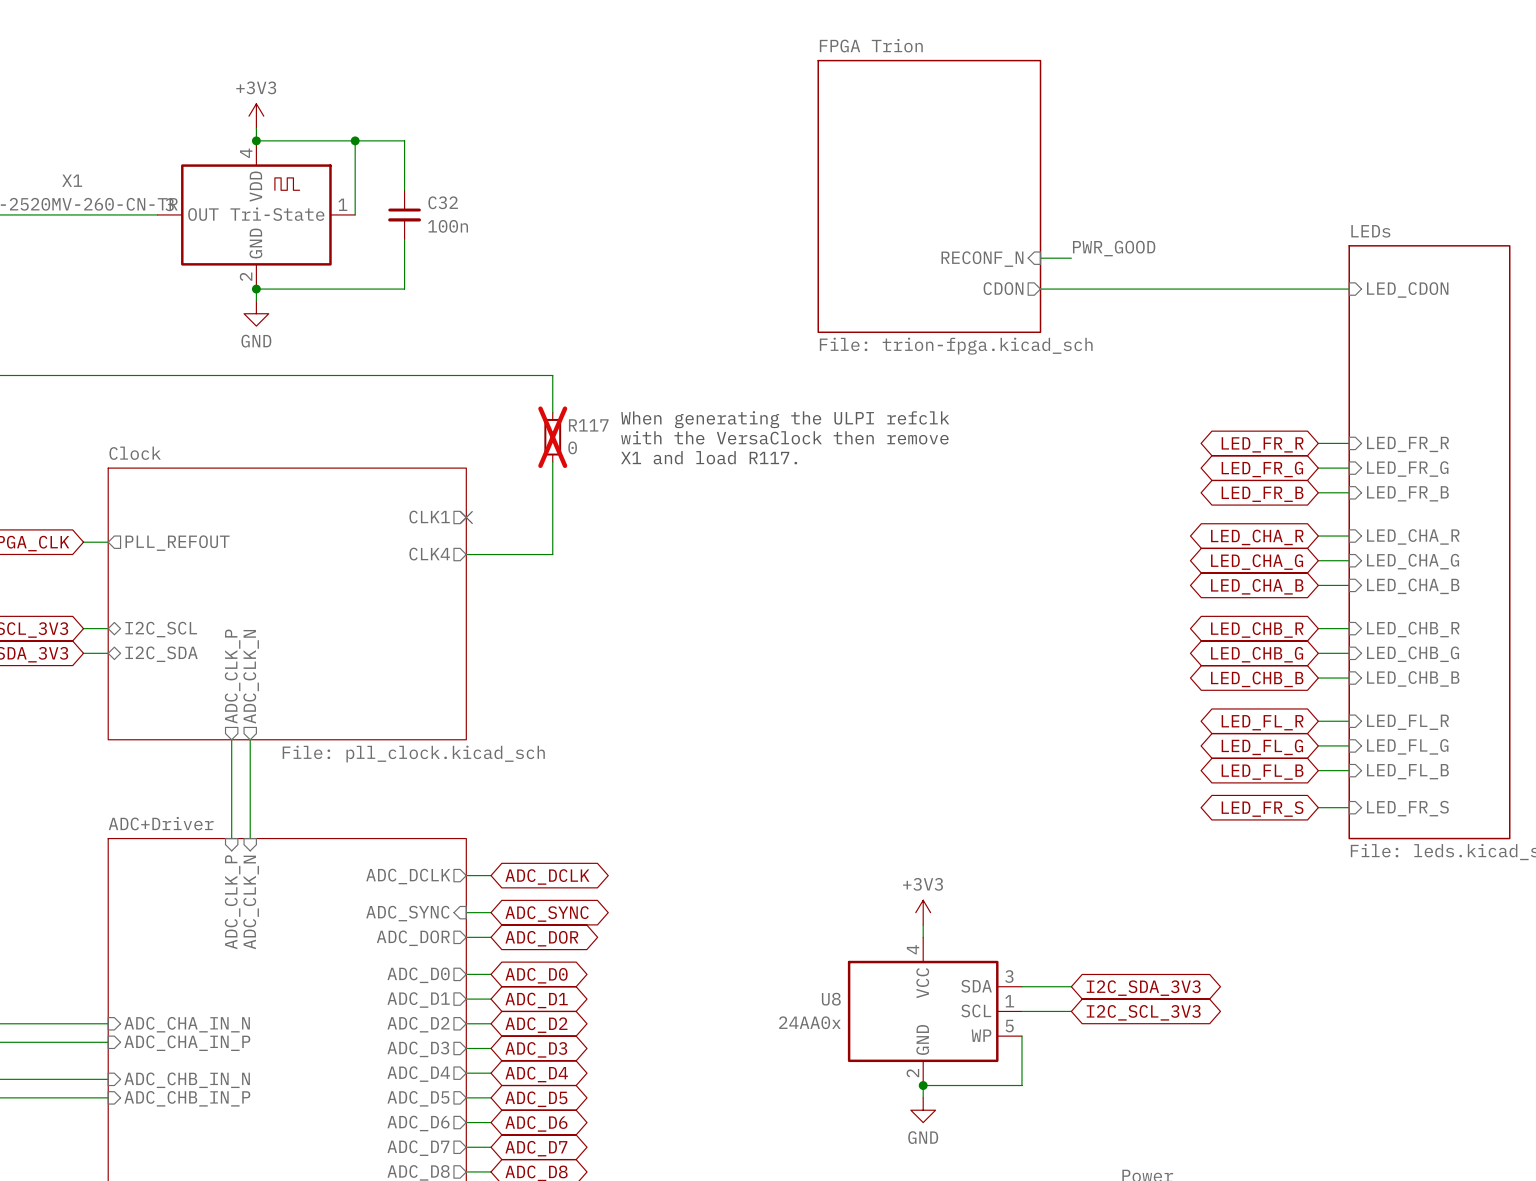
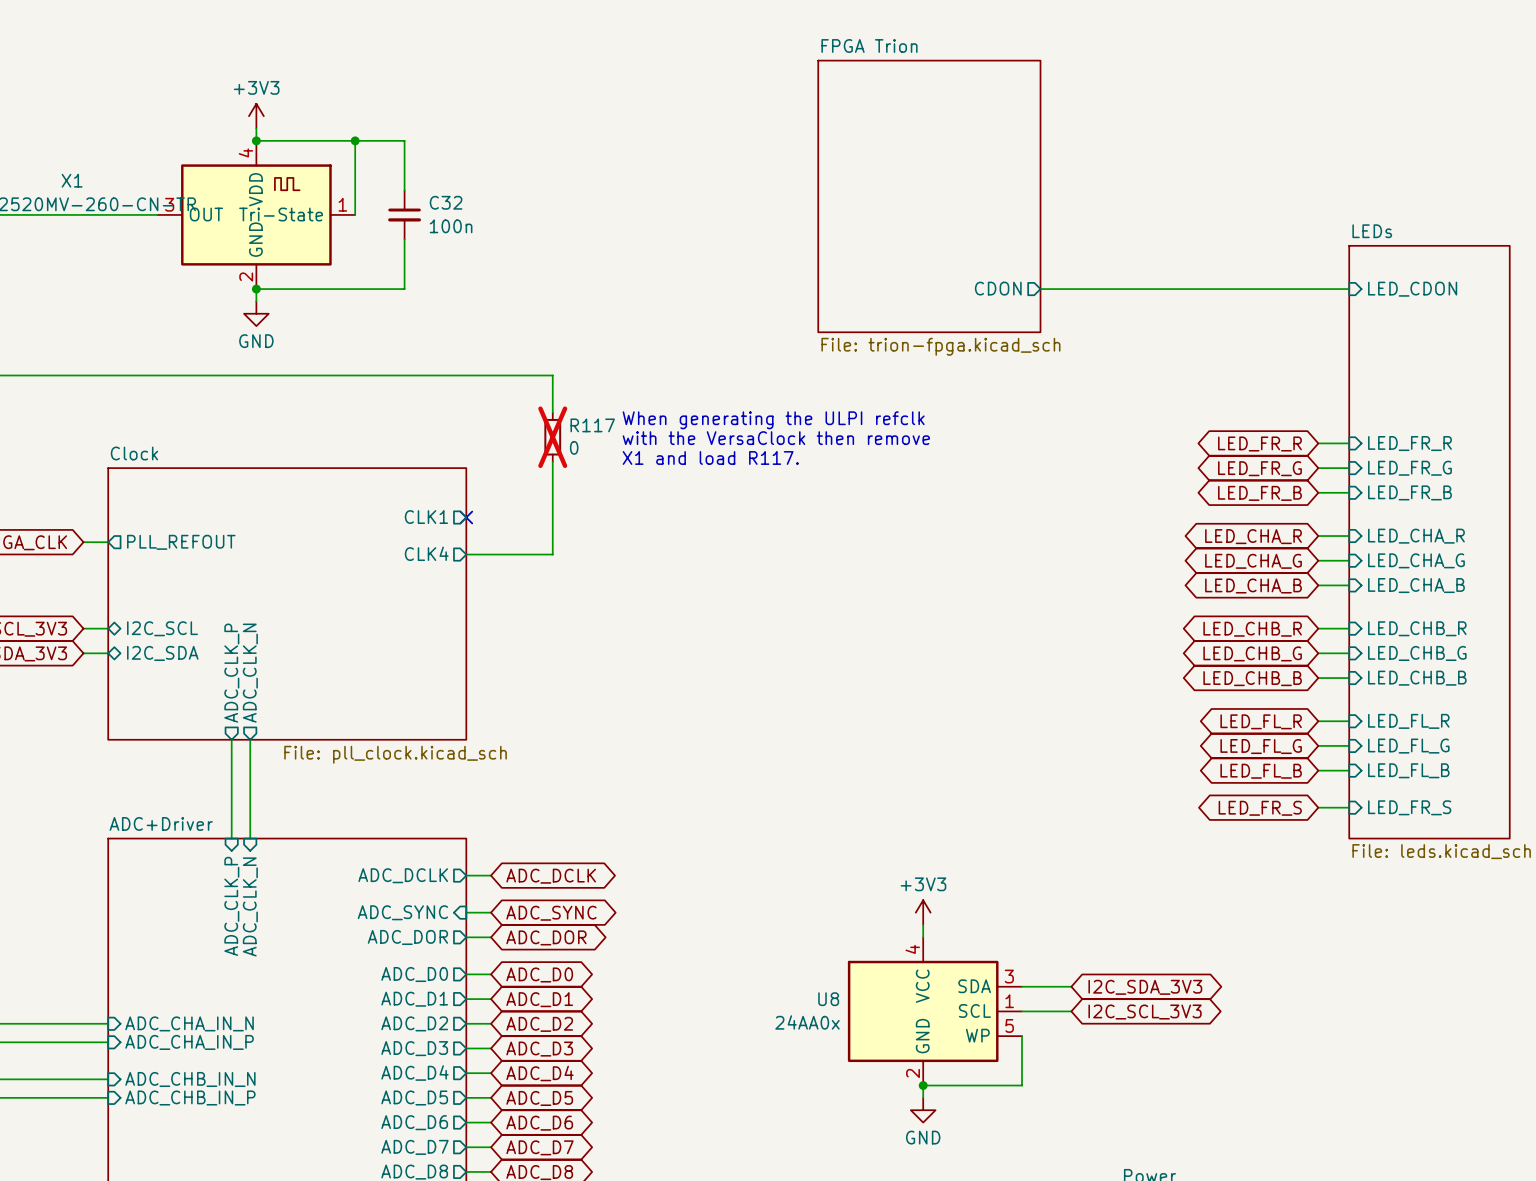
label: PWR_GOOD (1114, 248) -> none
wire: (1040, 258) (1071, 258) -> none
sheet pin: RECONF_N (982, 259) -> none

